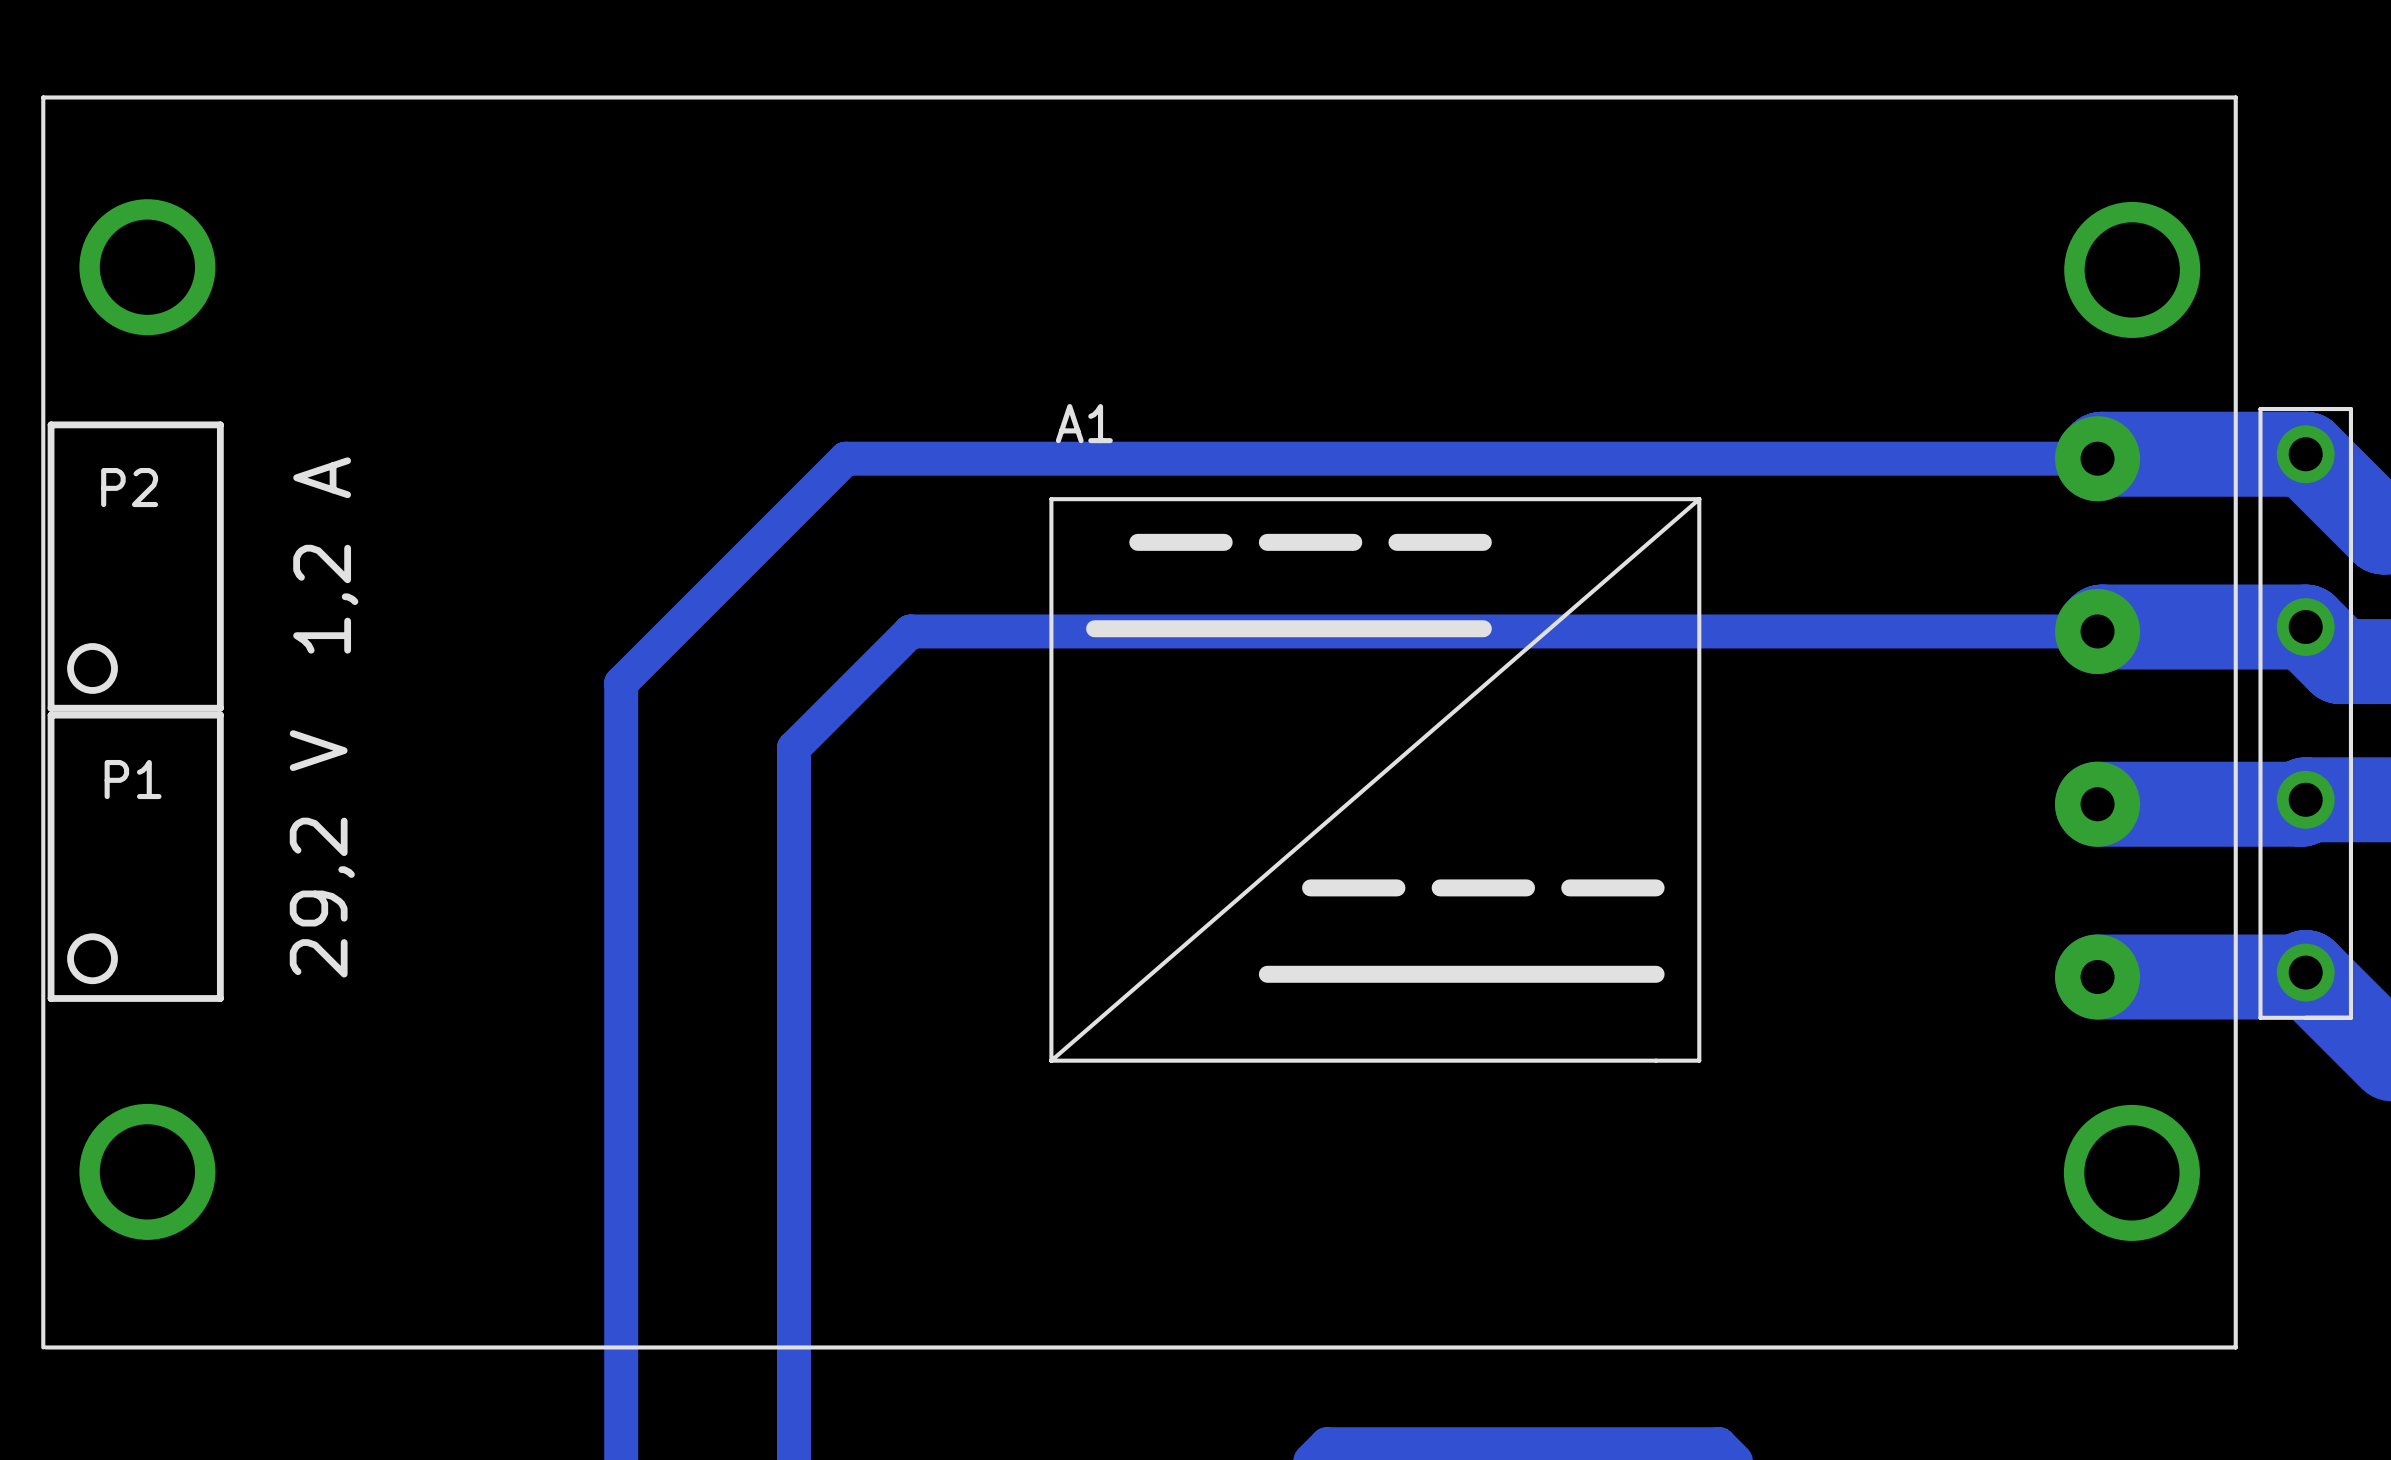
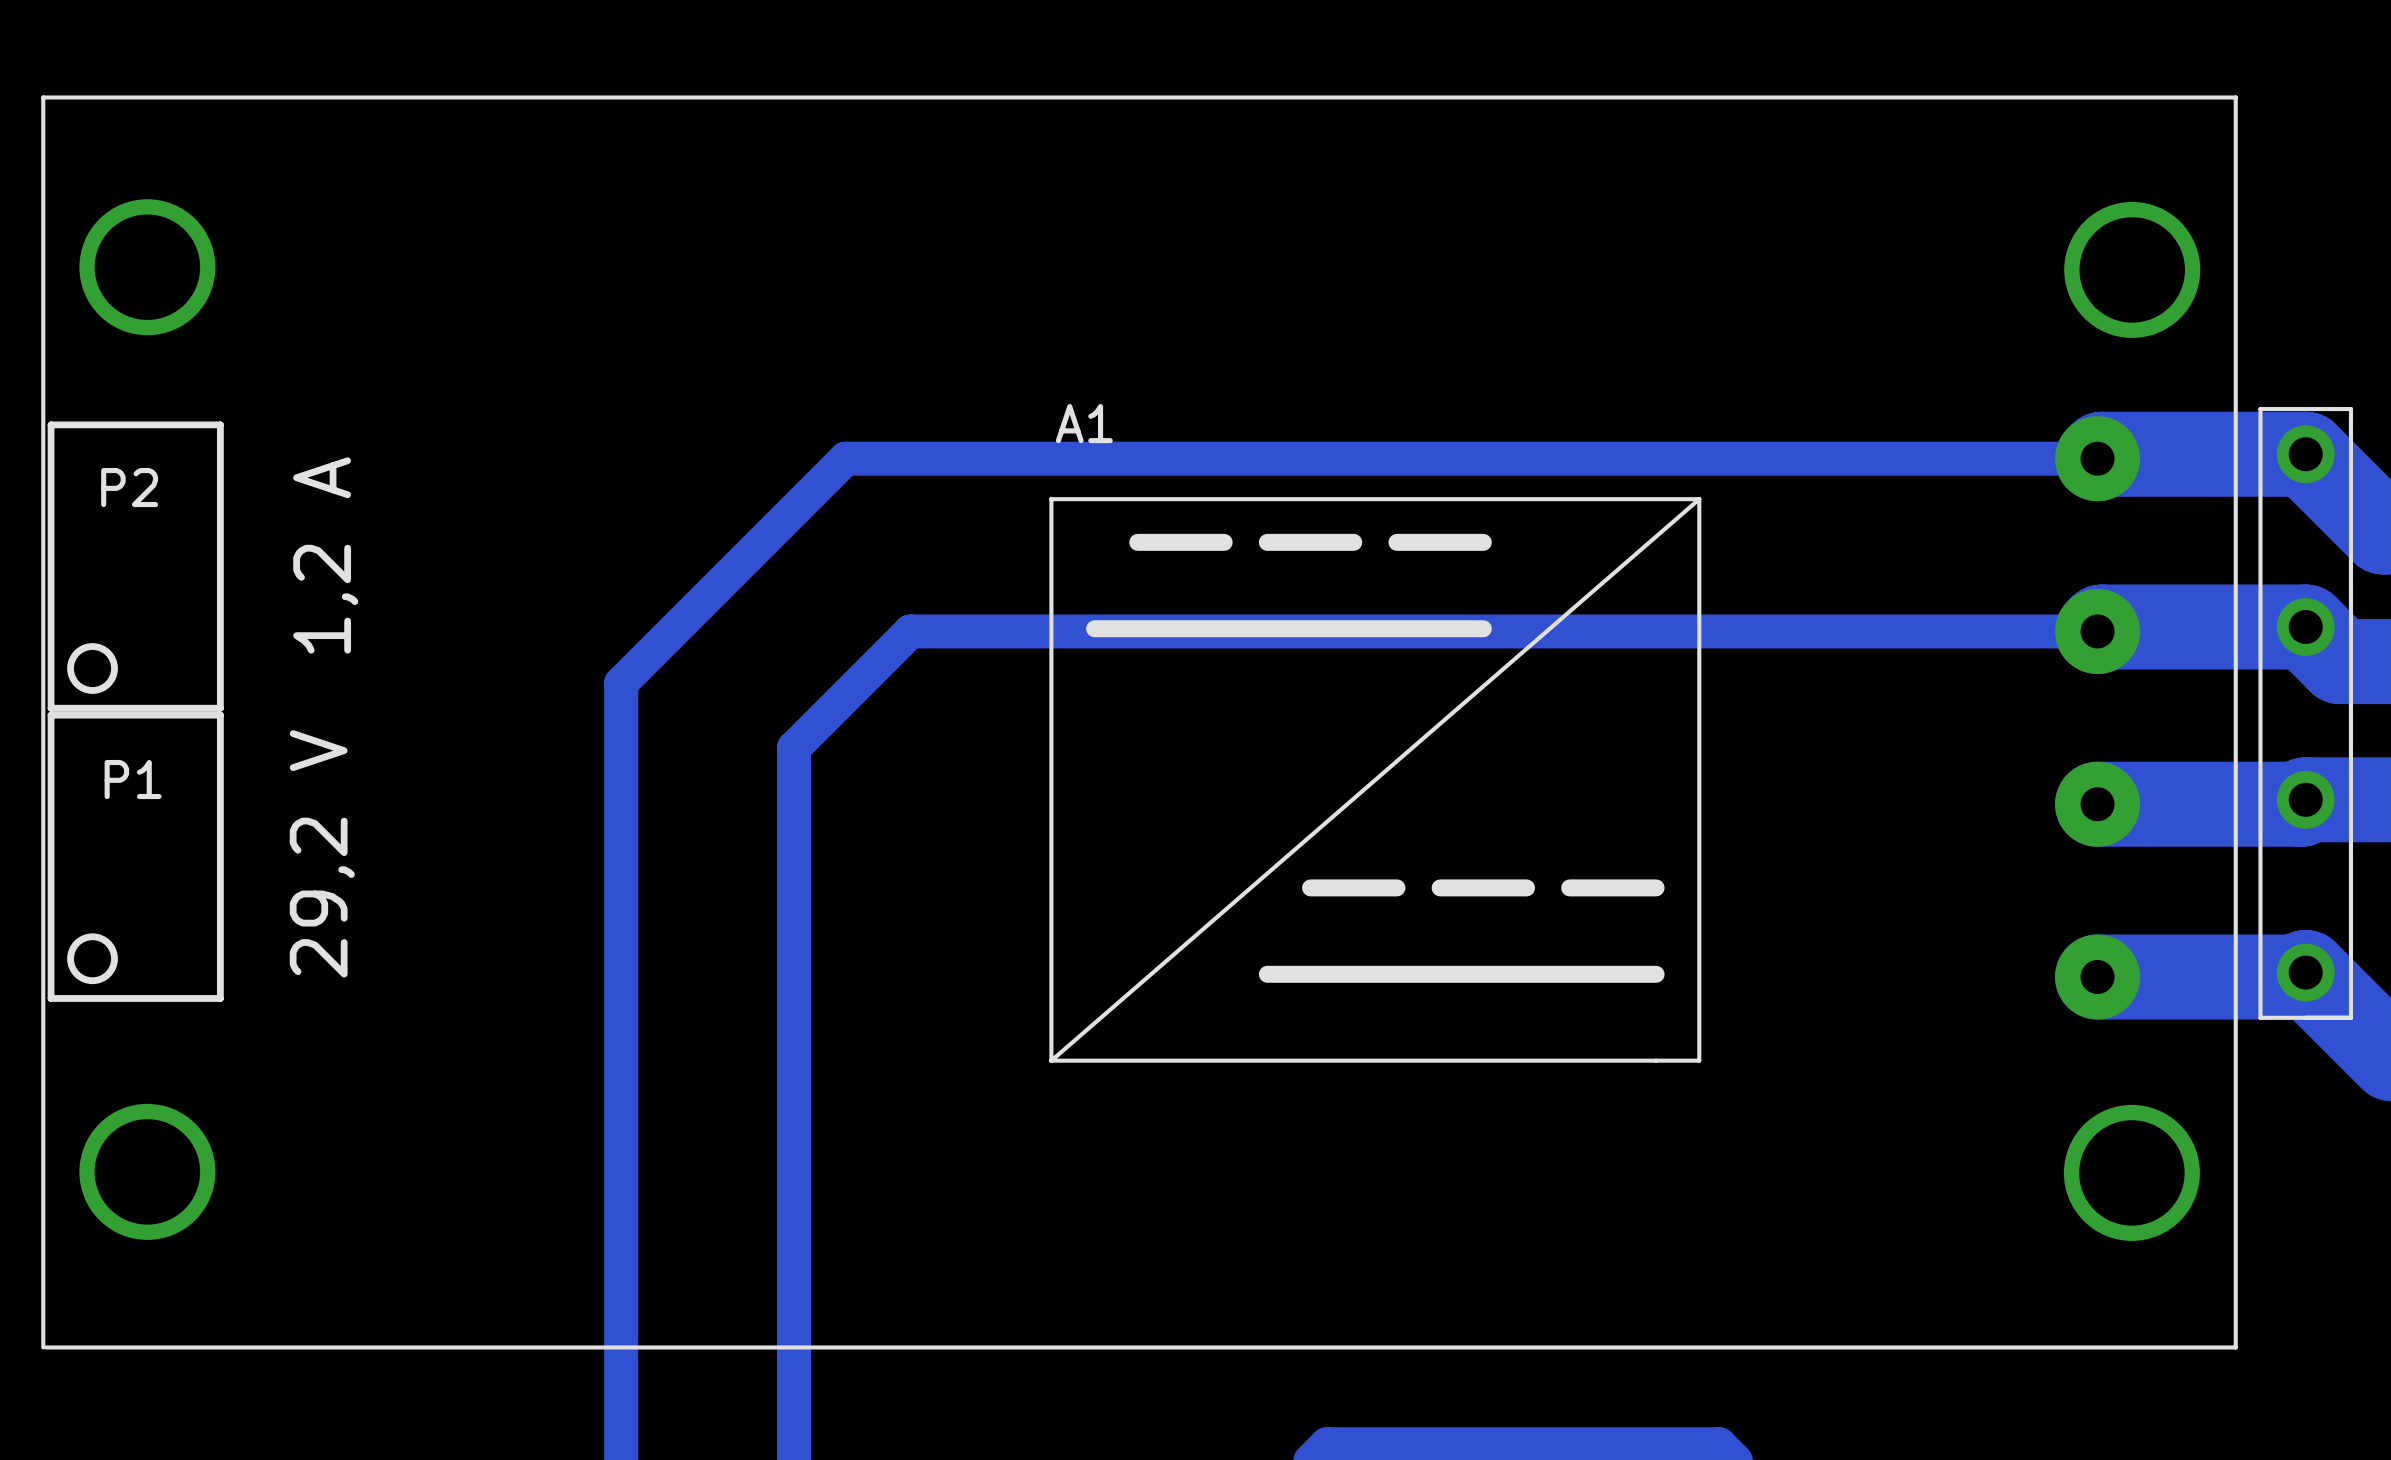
A1 footprint: [41, 95, 2238, 1350] -> [41, 95, 2238, 1350]

